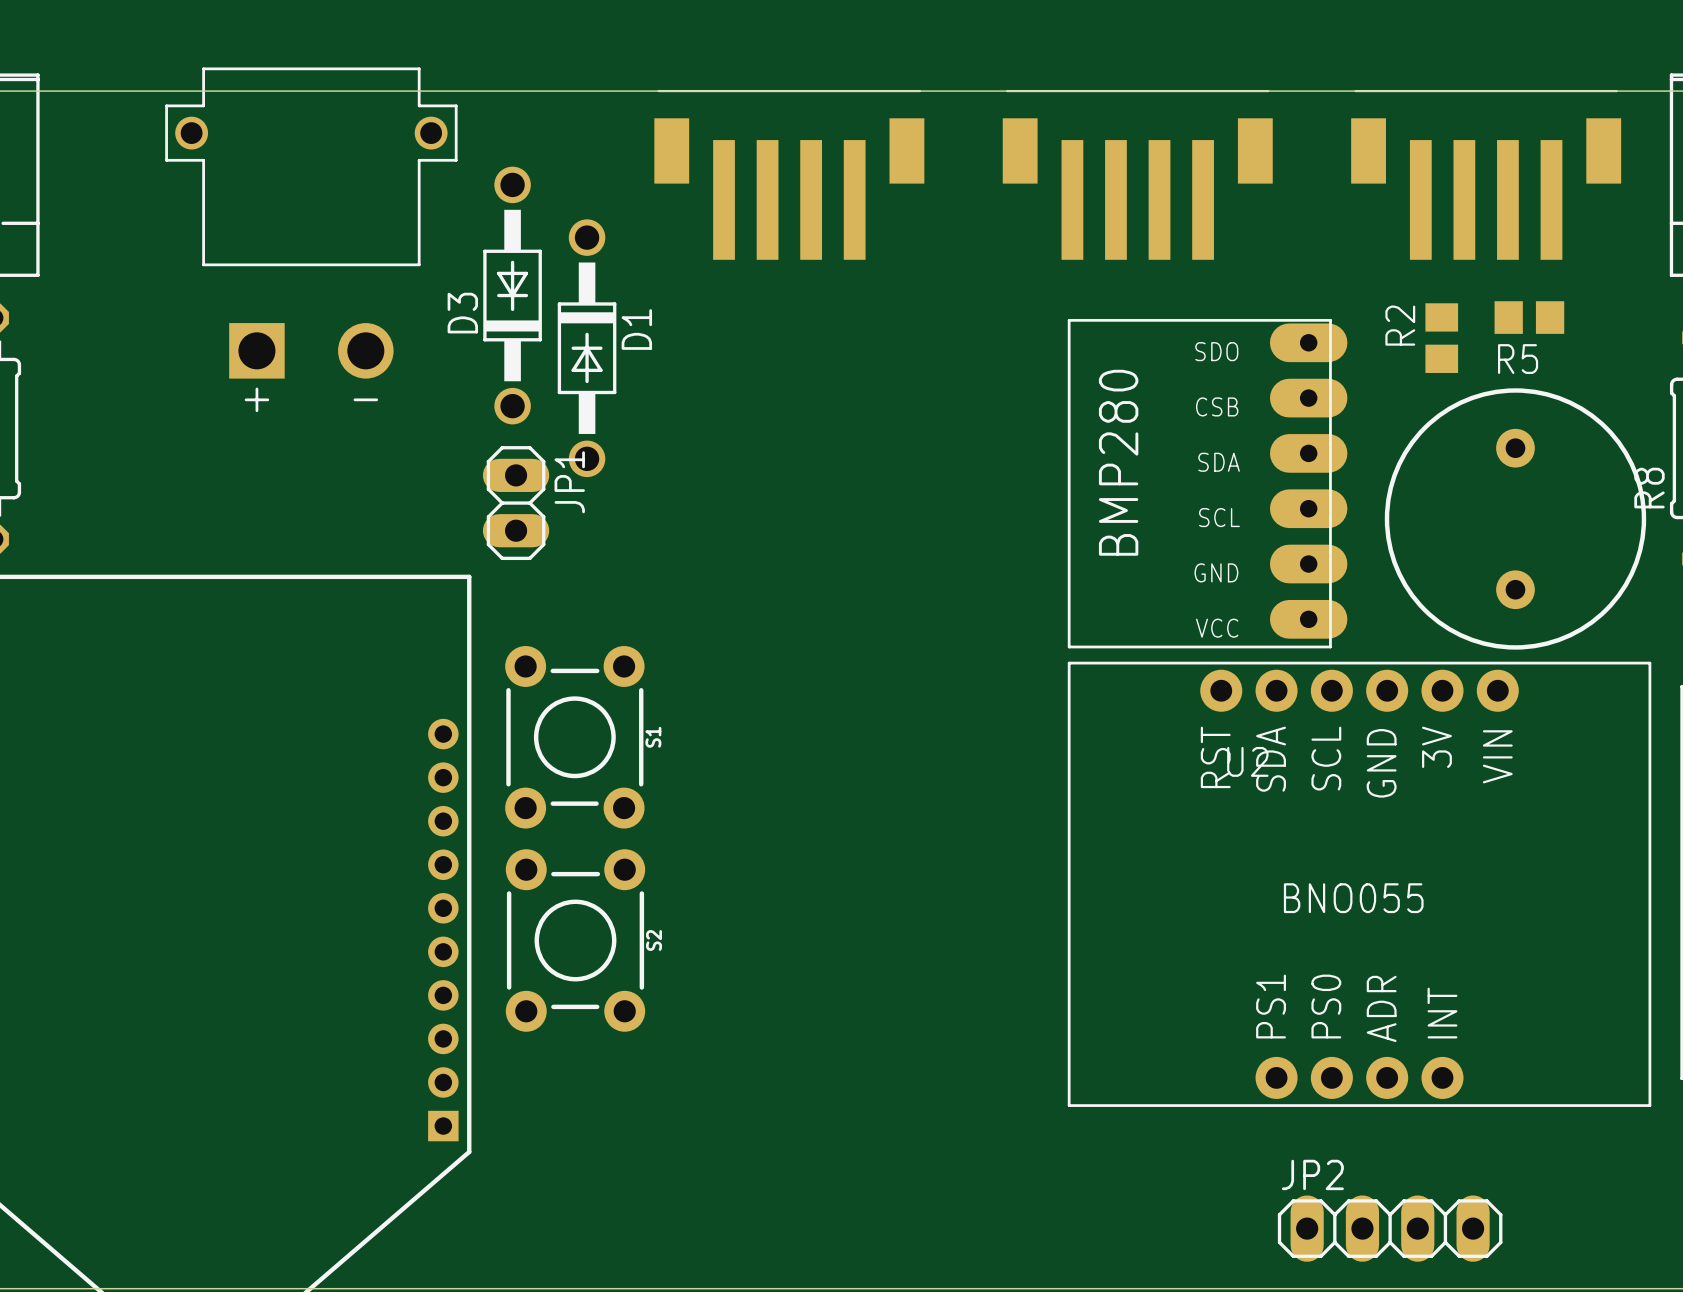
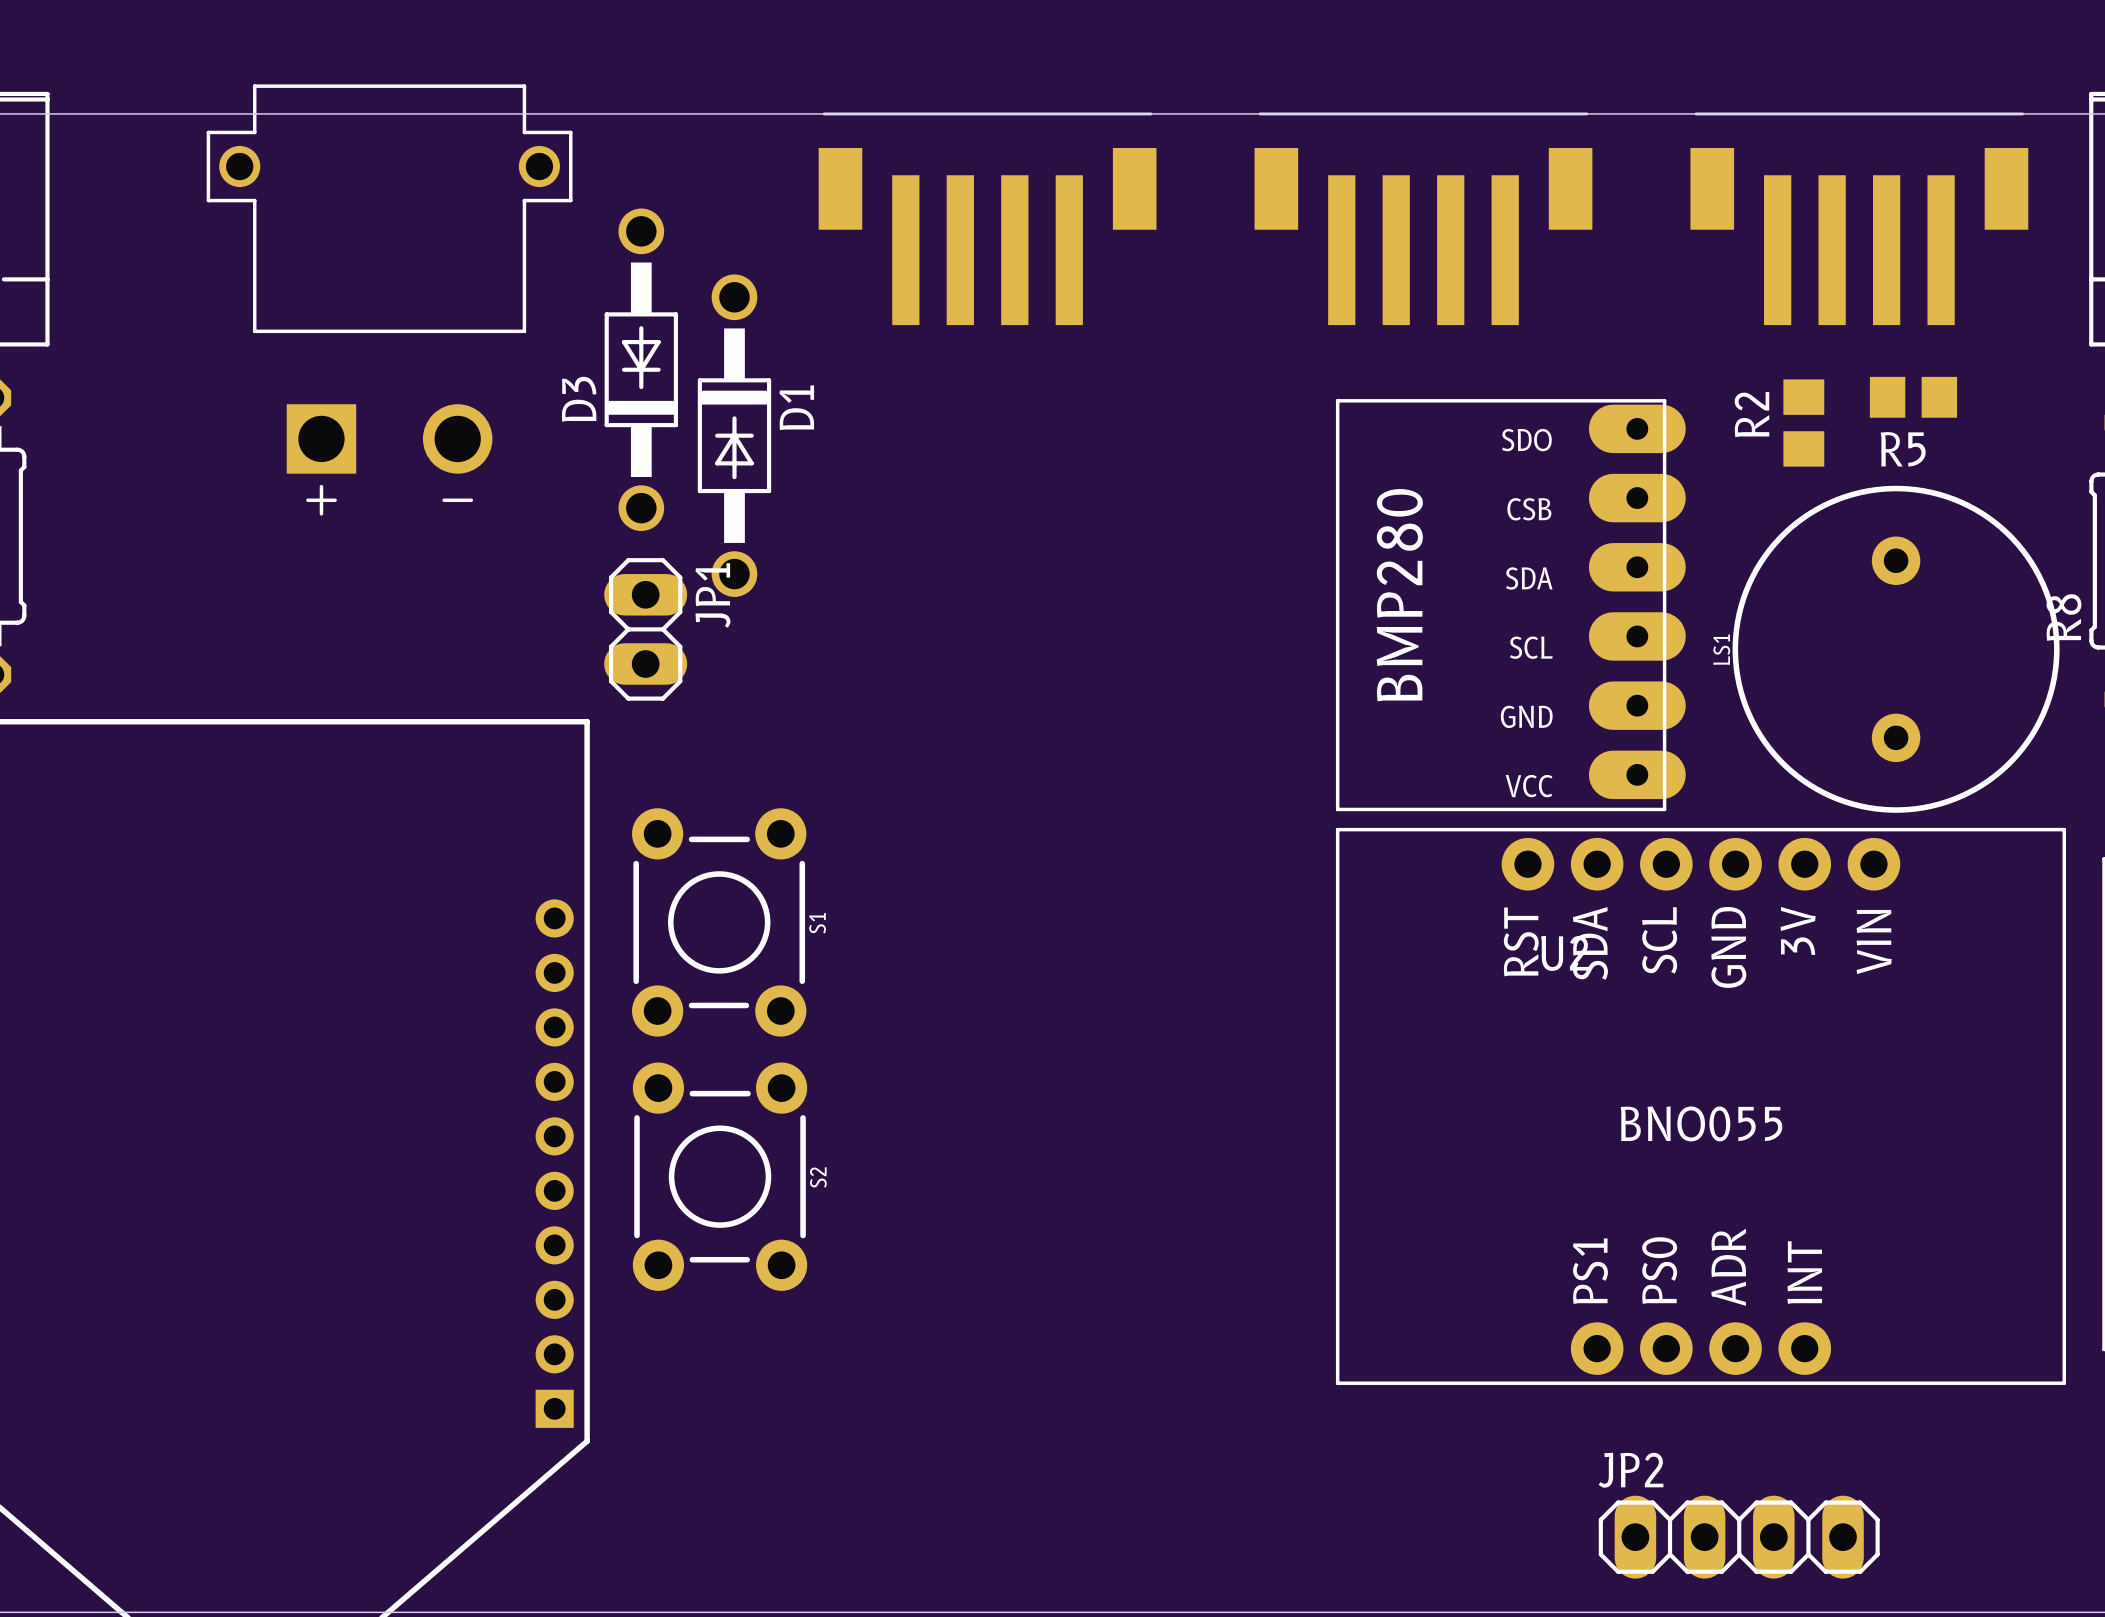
LS1 name: none -> LS1 (1721, 649)

